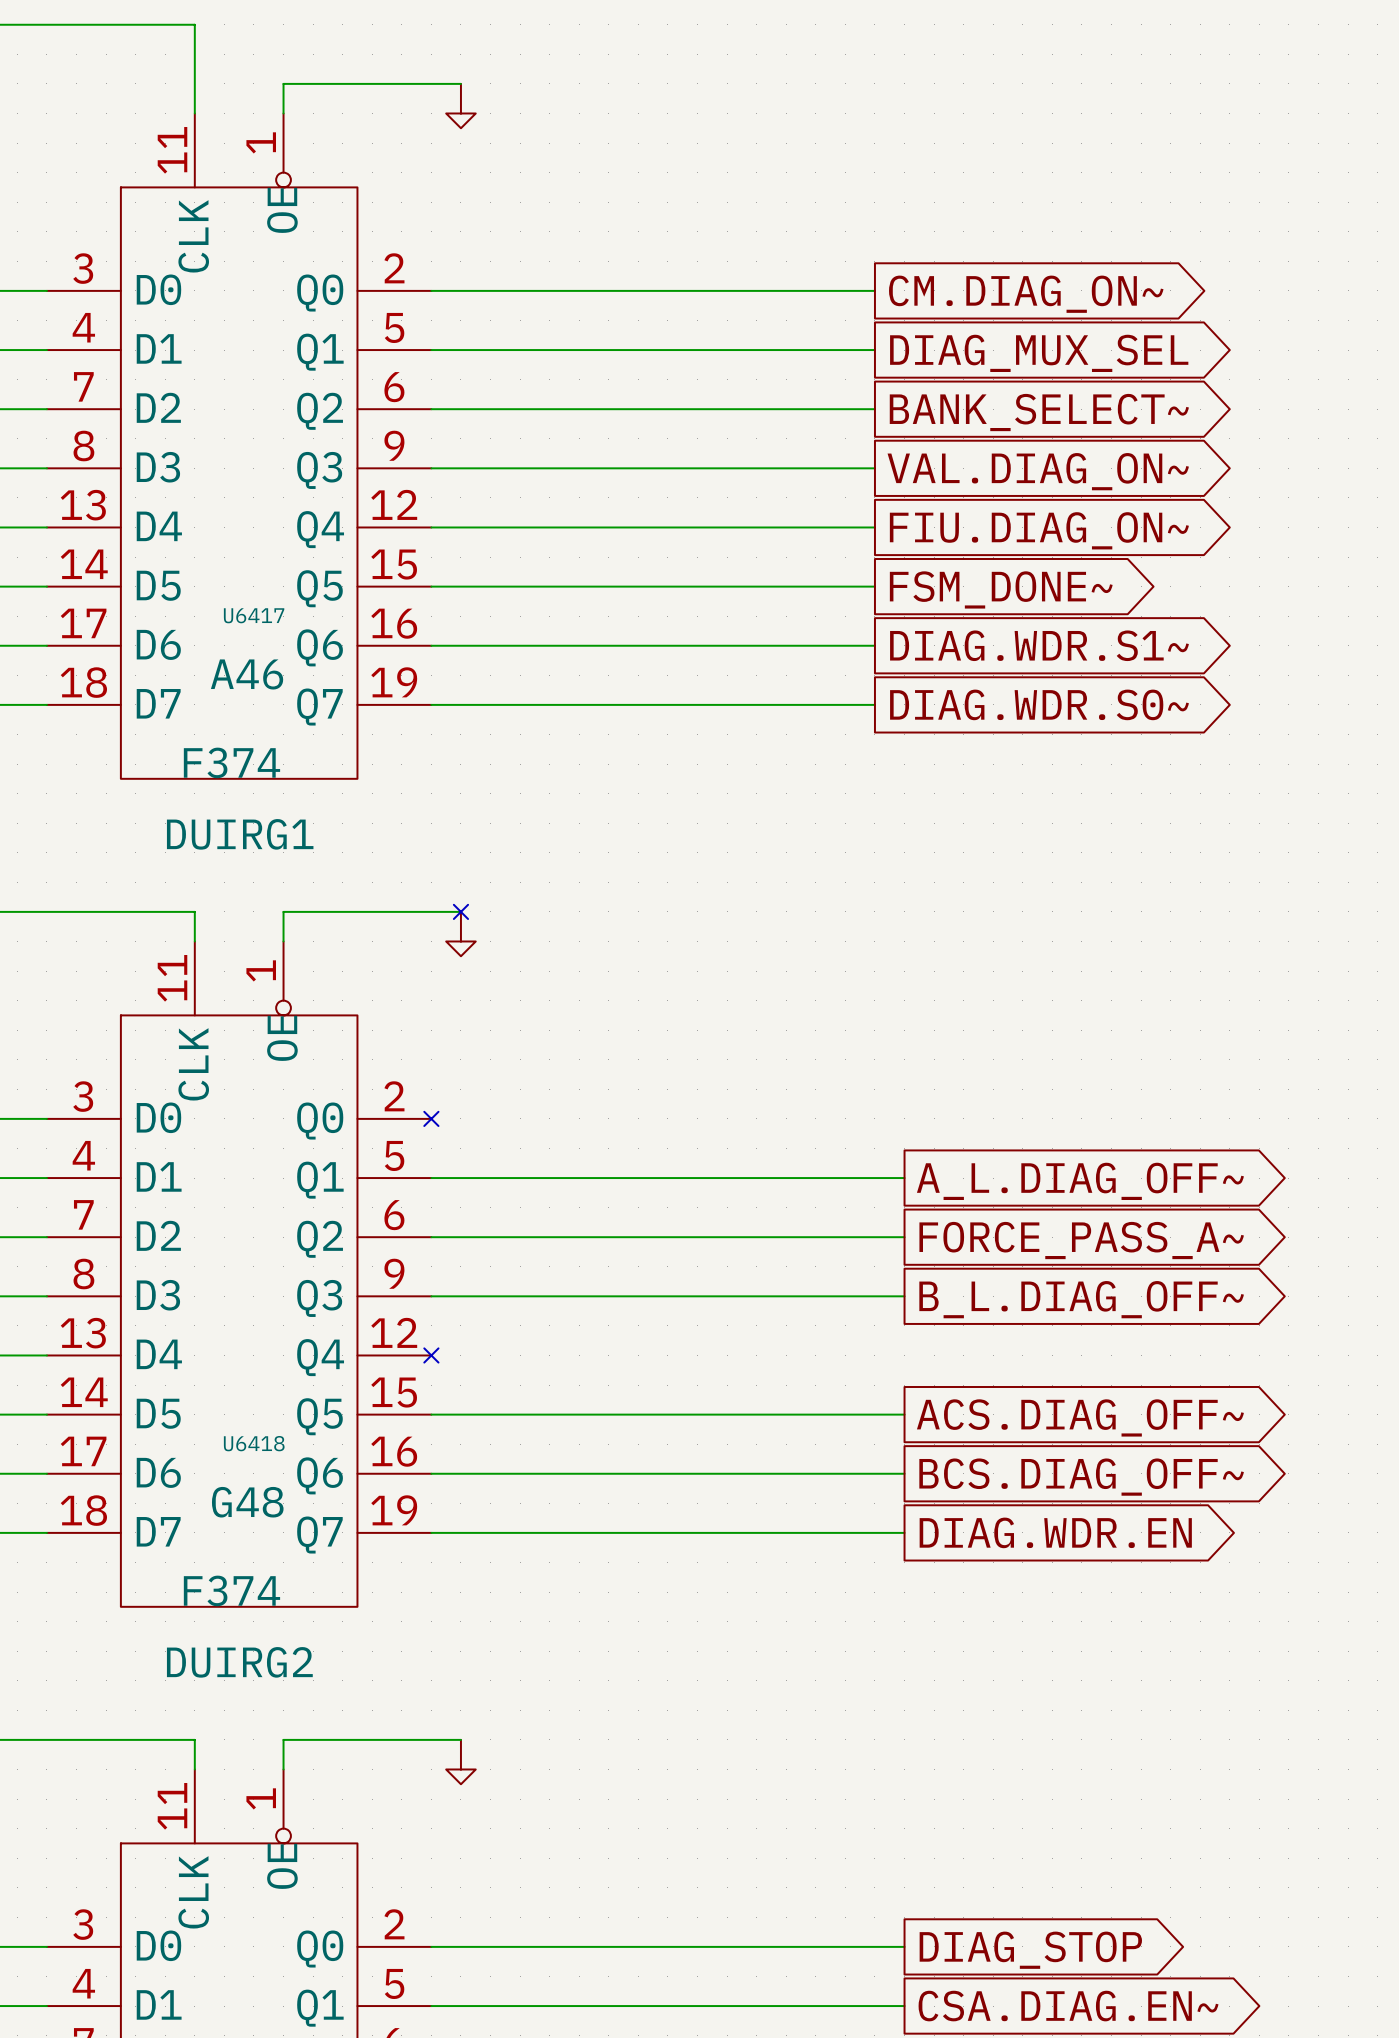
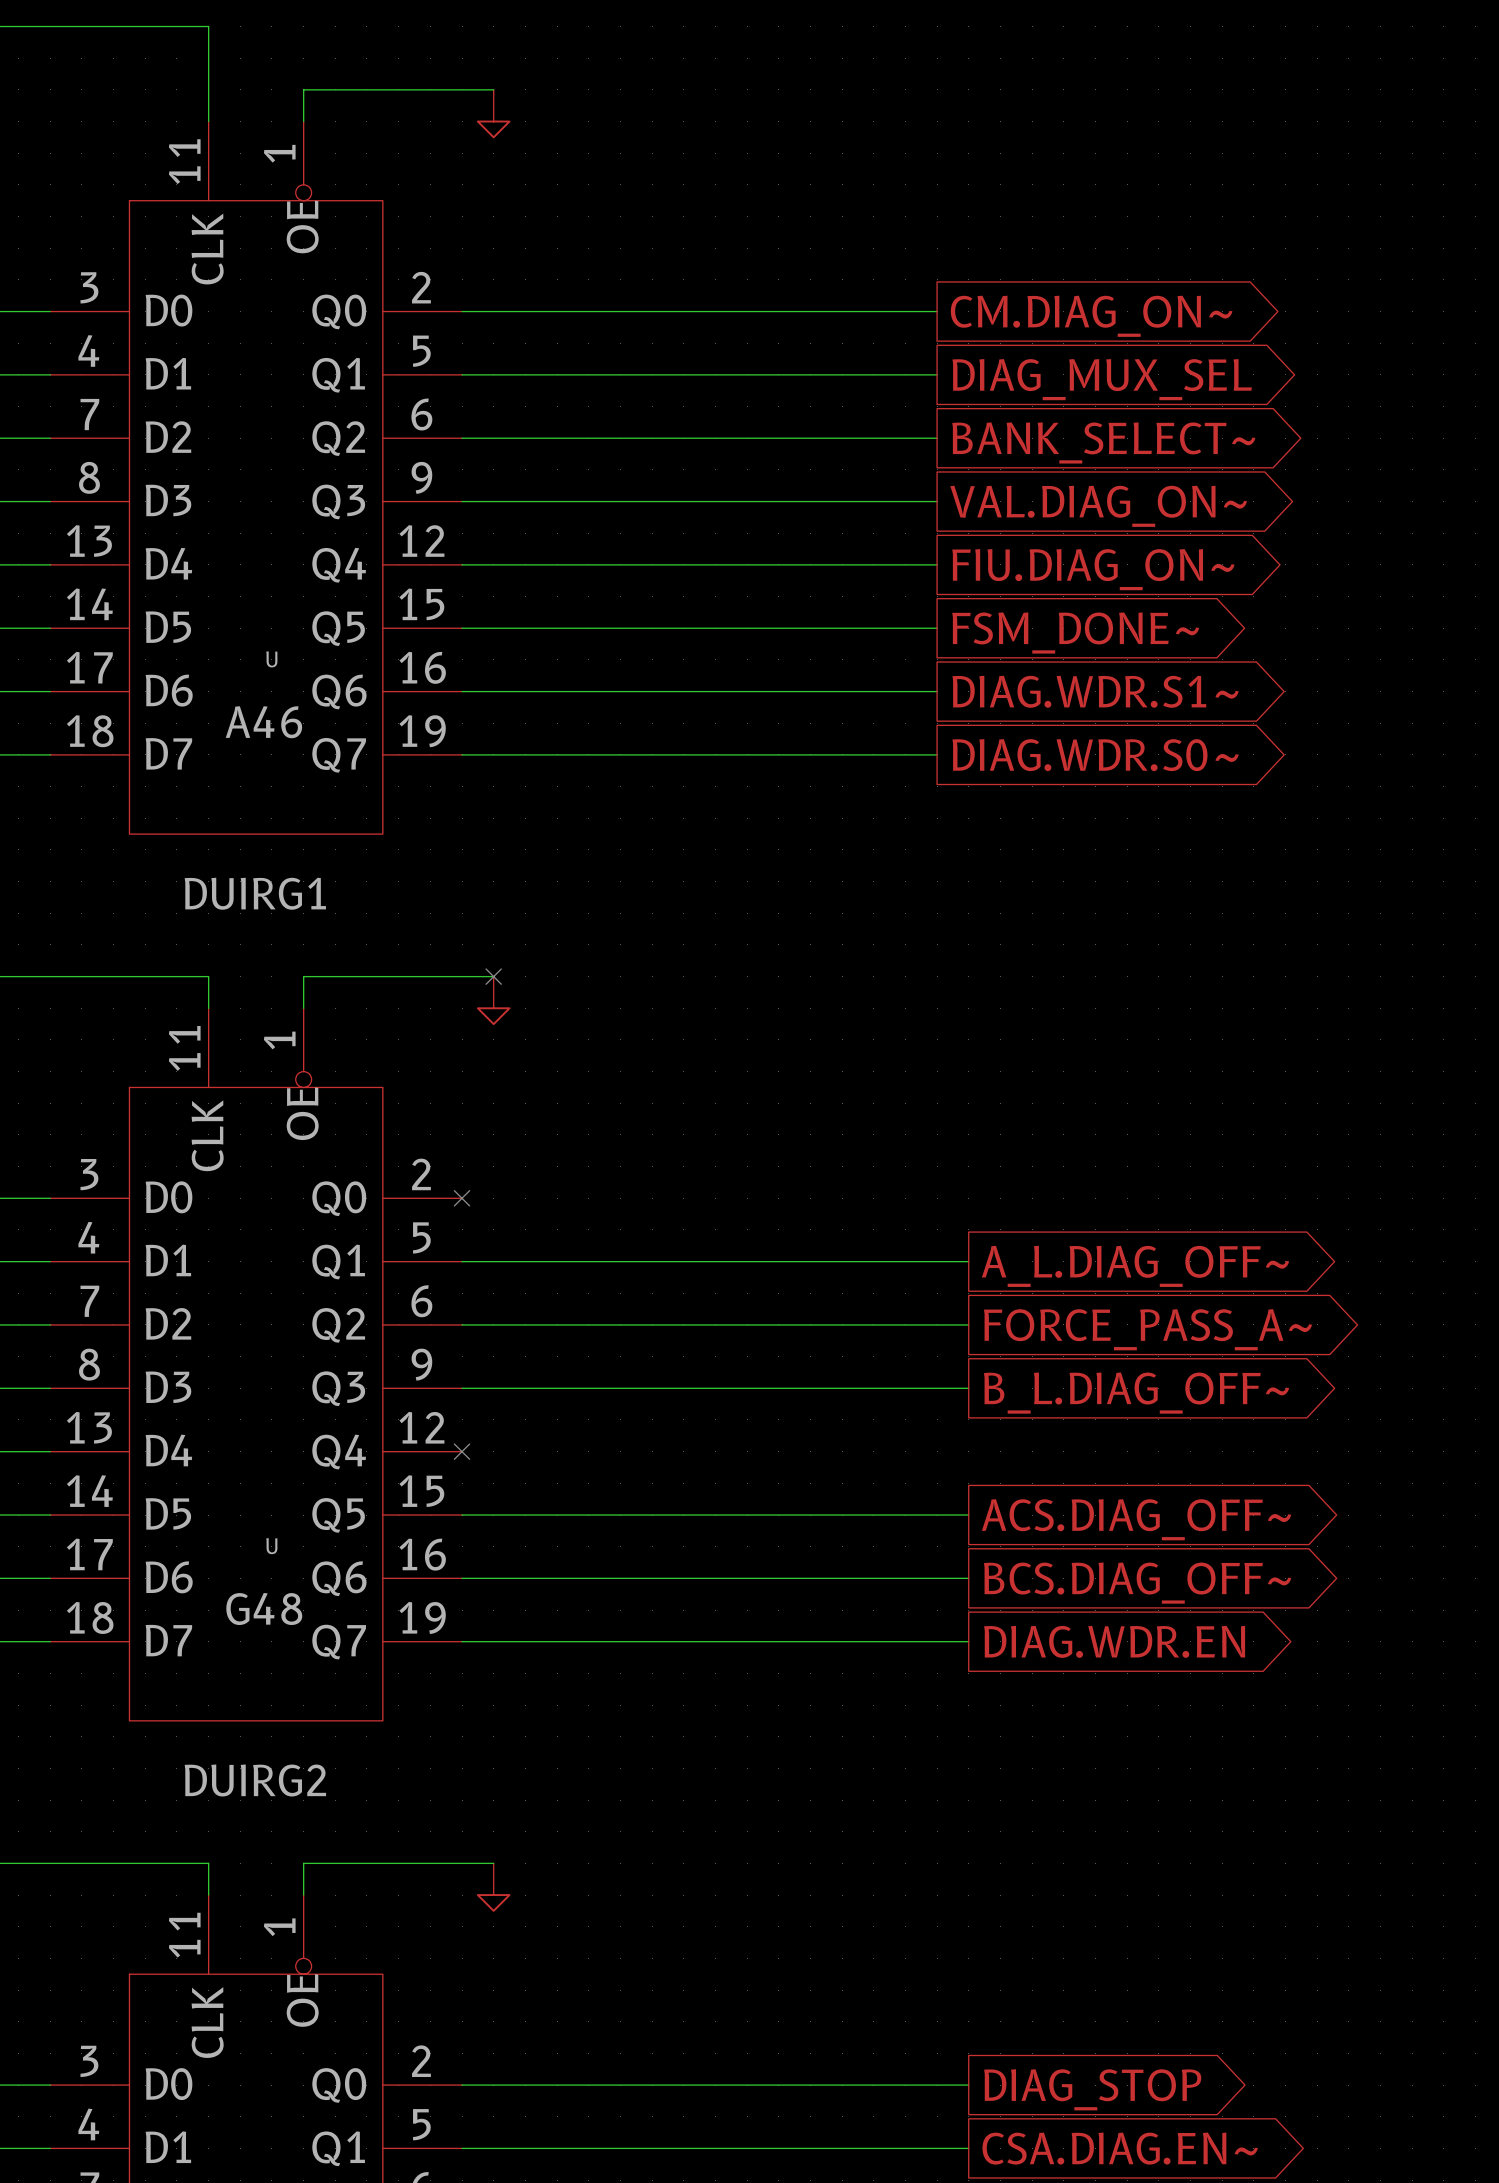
U6417 name: U6417 (254, 615) -> U (271, 659)
U6417 value: F374 (231, 762) -> none
U6418 name: U6418 (254, 1443) -> U (271, 1546)
U6418 value: F374 (231, 1590) -> none

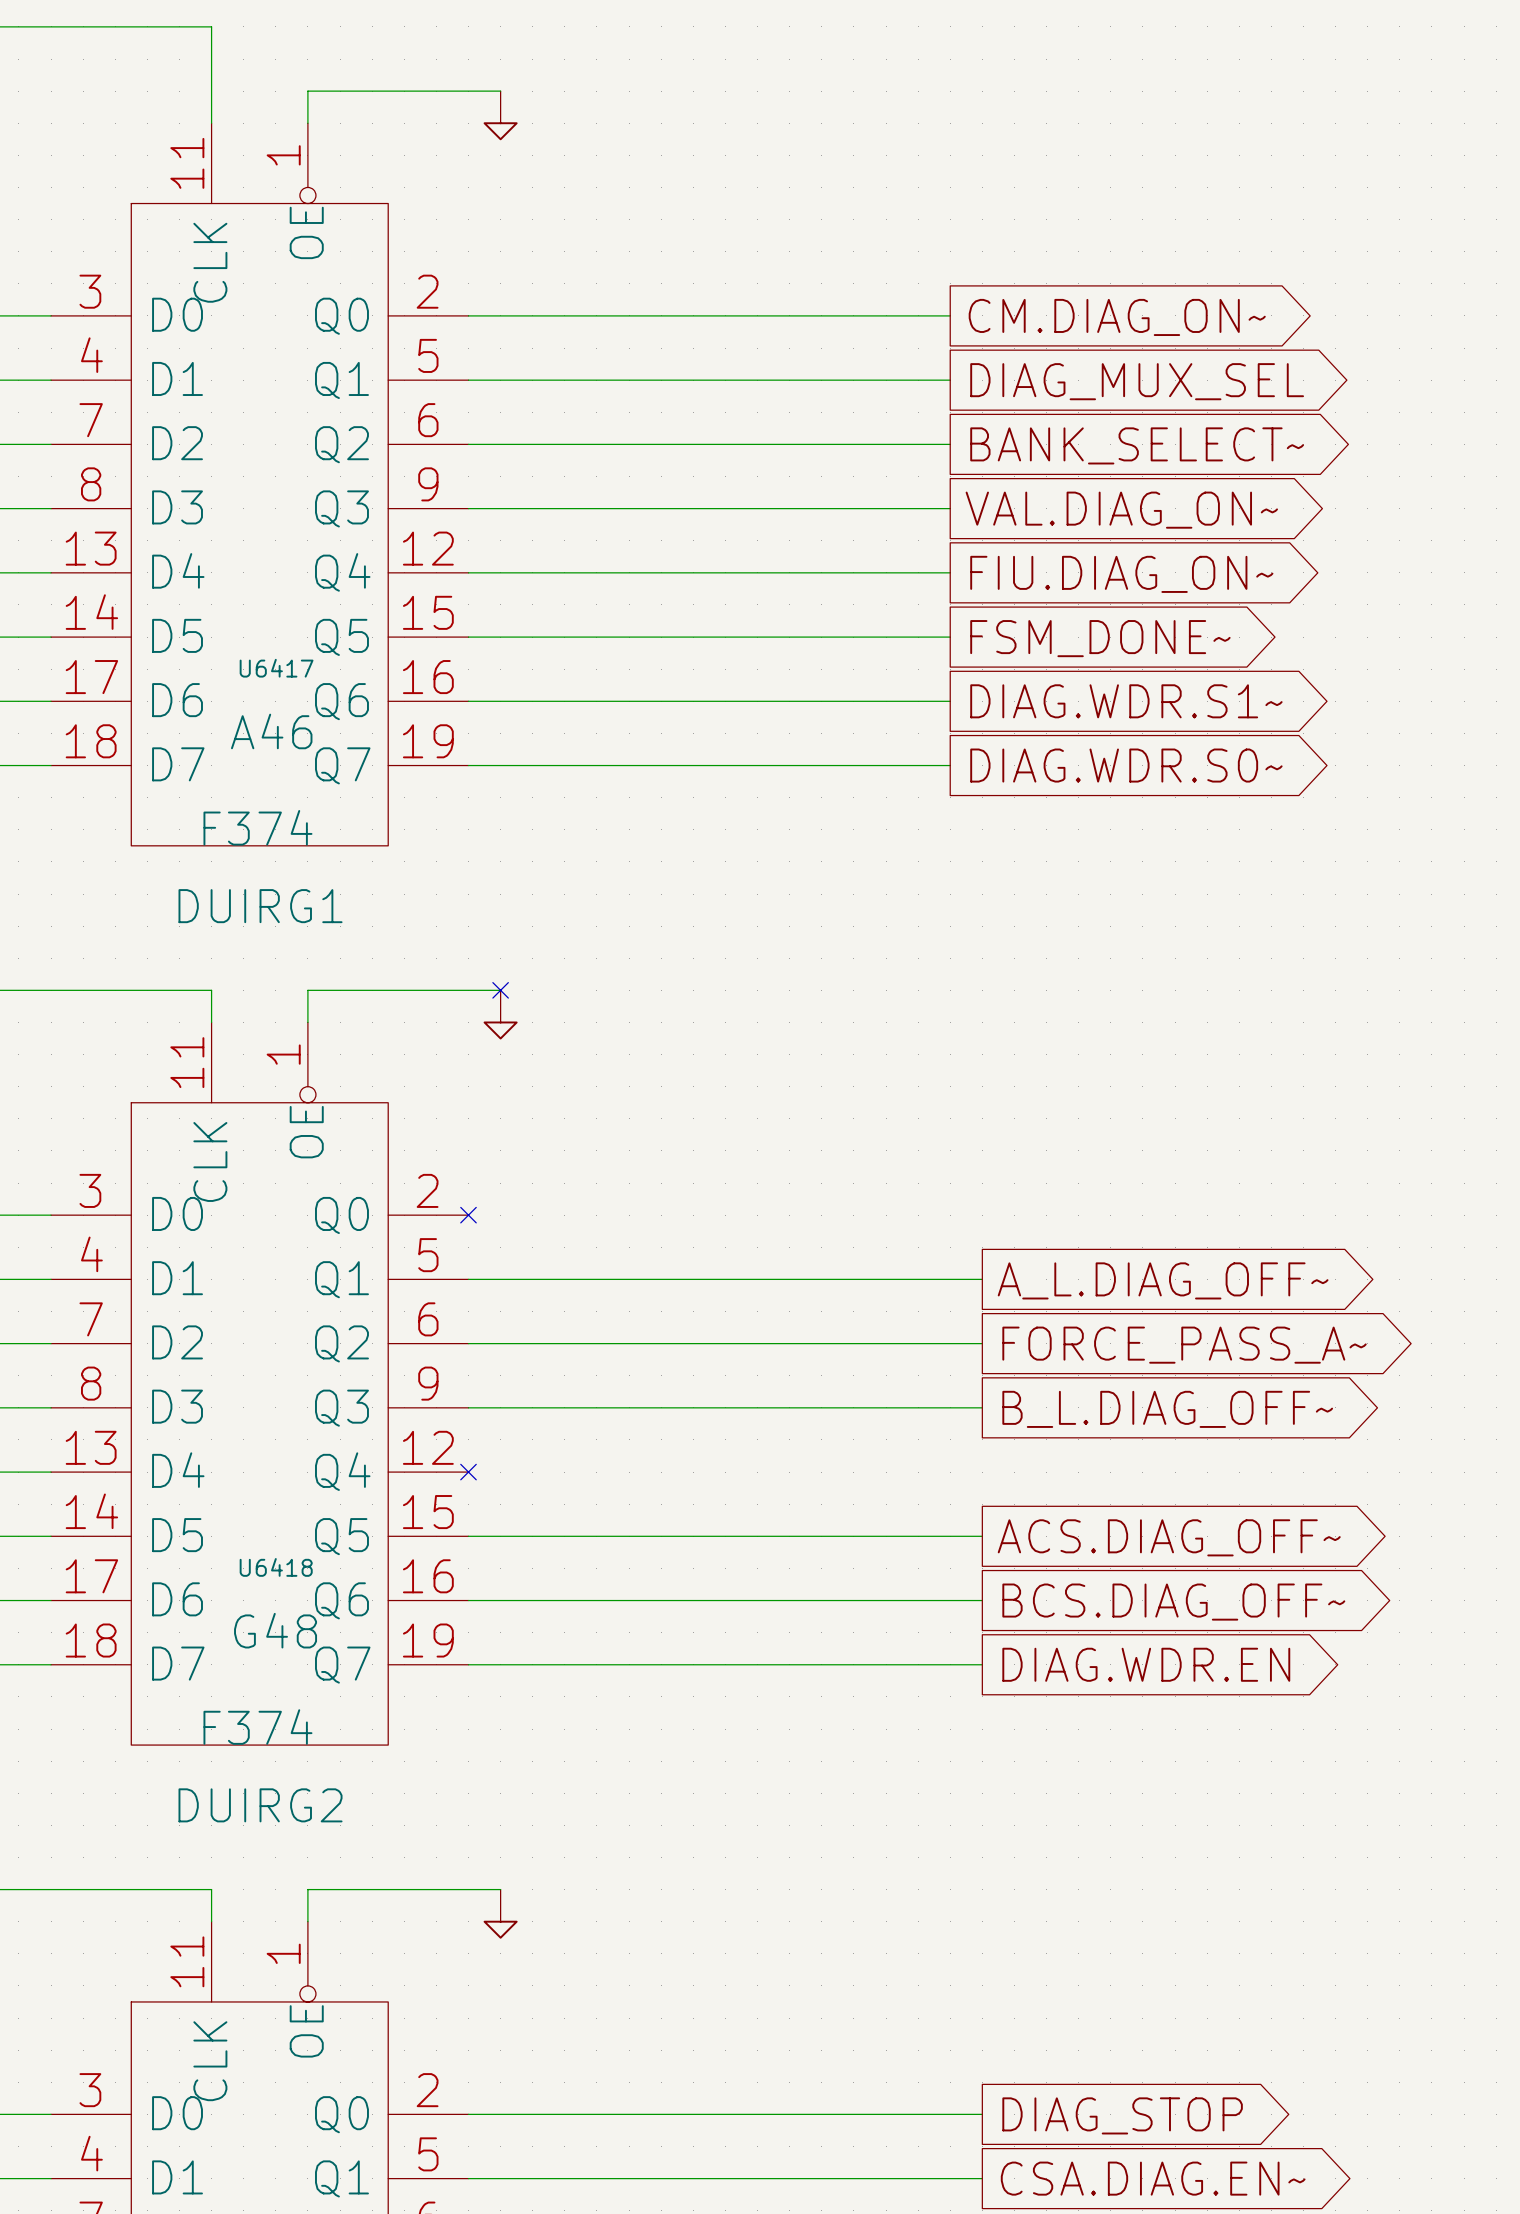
U name: U (271, 659) -> U6417 (276, 668)
U value: none -> F374 (257, 827)
U name: U (271, 1546) -> U6418 (276, 1567)
U value: none -> F374 (257, 1727)

